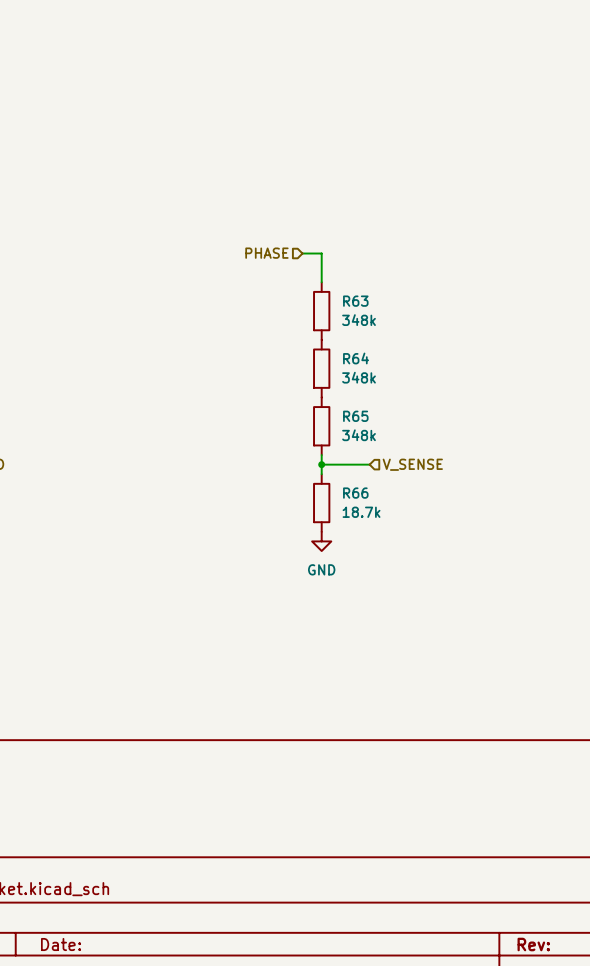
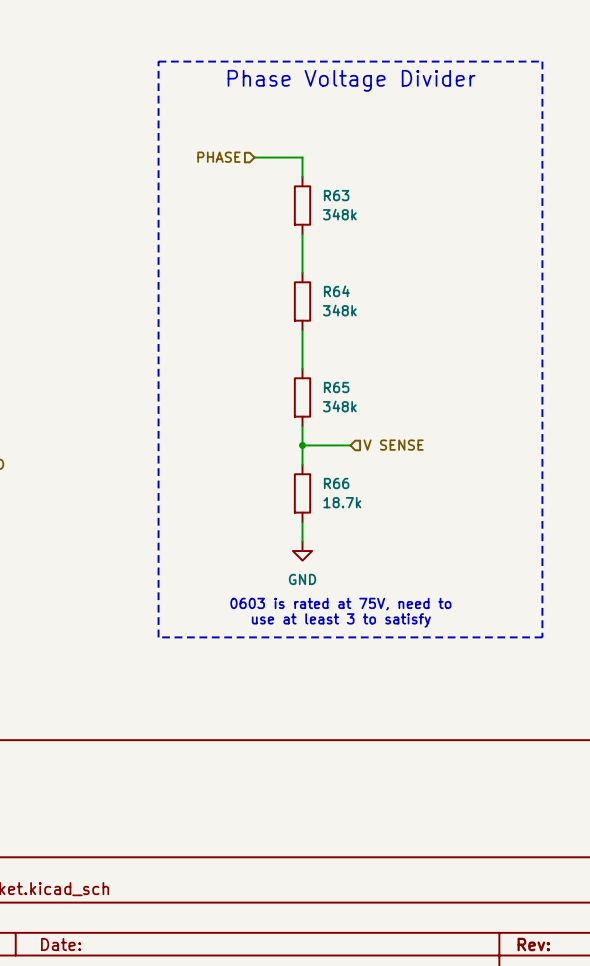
line: none -> (158, 61) (542, 61) (542, 637) (158, 637) (158, 61)
text: none -> Phase Voltage Divider (351, 80)
wire: none -> (254, 157) (302, 157) (302, 176)
wire: none -> (302, 234) (302, 272)
hierarchical label position: PHASE (266, 253) -> PHASE (218, 157)
wire: (302, 253) (321, 253) (321, 282) -> none
R63 position: (321, 311) -> (302, 205)
wire: none -> (302, 330) (302, 368)
R64 position: (321, 368) -> (302, 301)
wire: none -> (302, 426) (302, 464)
R65 position: (321, 426) -> (302, 397)
wire: (321, 455) (321, 474) -> (302, 522) (302, 541)
wire: (321, 464) (369, 464) -> (302, 445) (350, 445)
junction position: (321, 464) -> (302, 445)
hierarchical label: V_SENSE (412, 464) -> V SENSE (393, 445)
R66 position: (321, 503) -> (302, 493)
power symbol position: GND (321, 541) -> GND (302, 551)
text: none -> 0603 is rated at 75V, need to (340, 604)
text: none -> use at least 3 to satisfy (341, 620)

